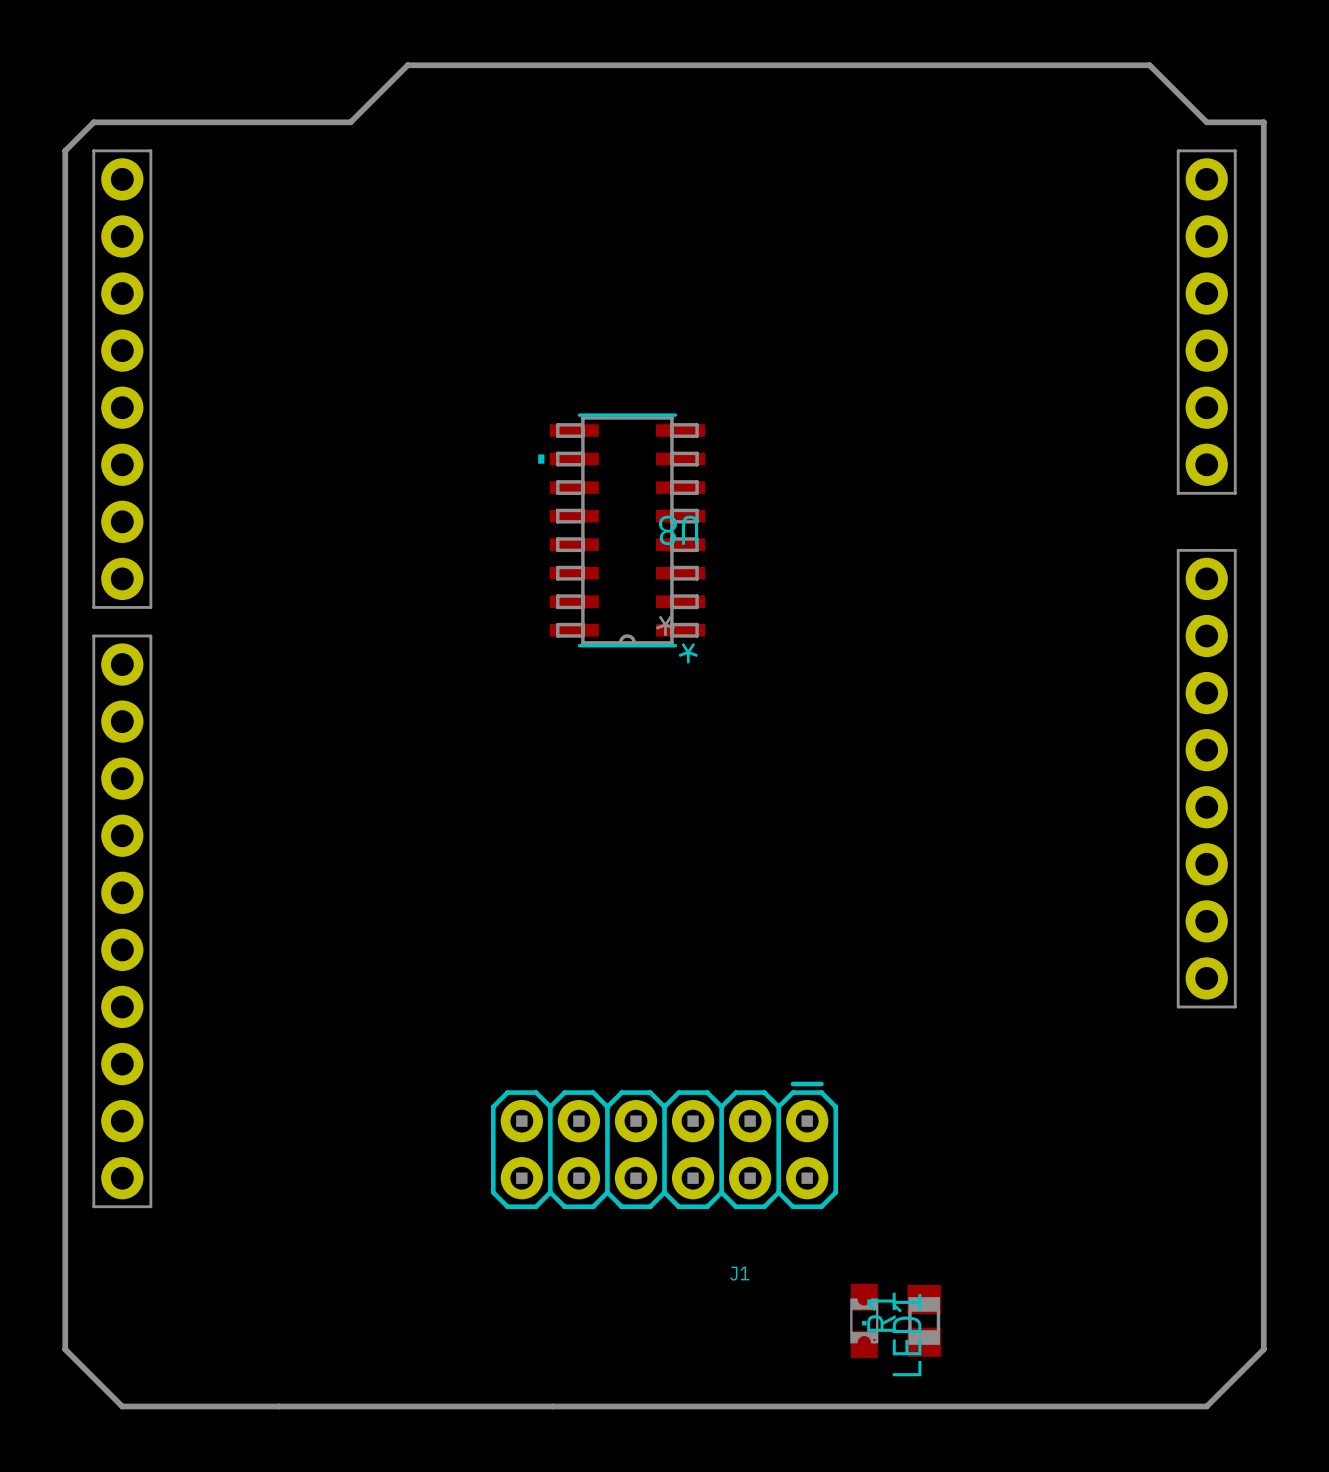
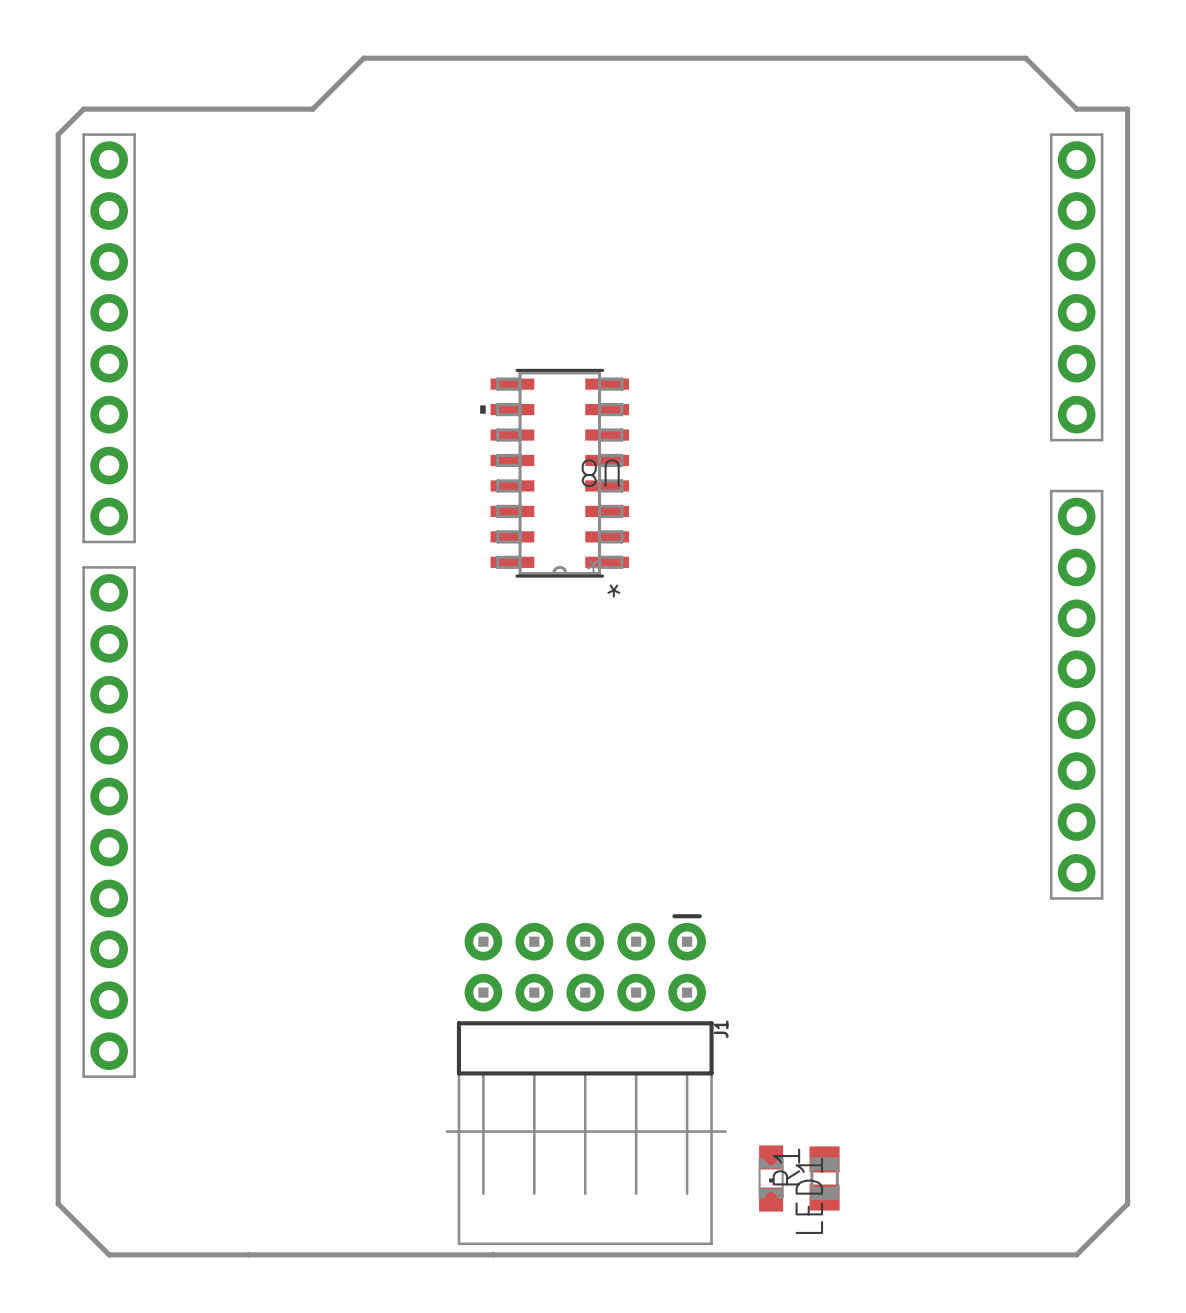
J1 footprint: [491, 1081, 839, 1210] -> [445, 914, 727, 1246]
J1 name position: J1 (739, 1273) -> J1 (721, 1029)

